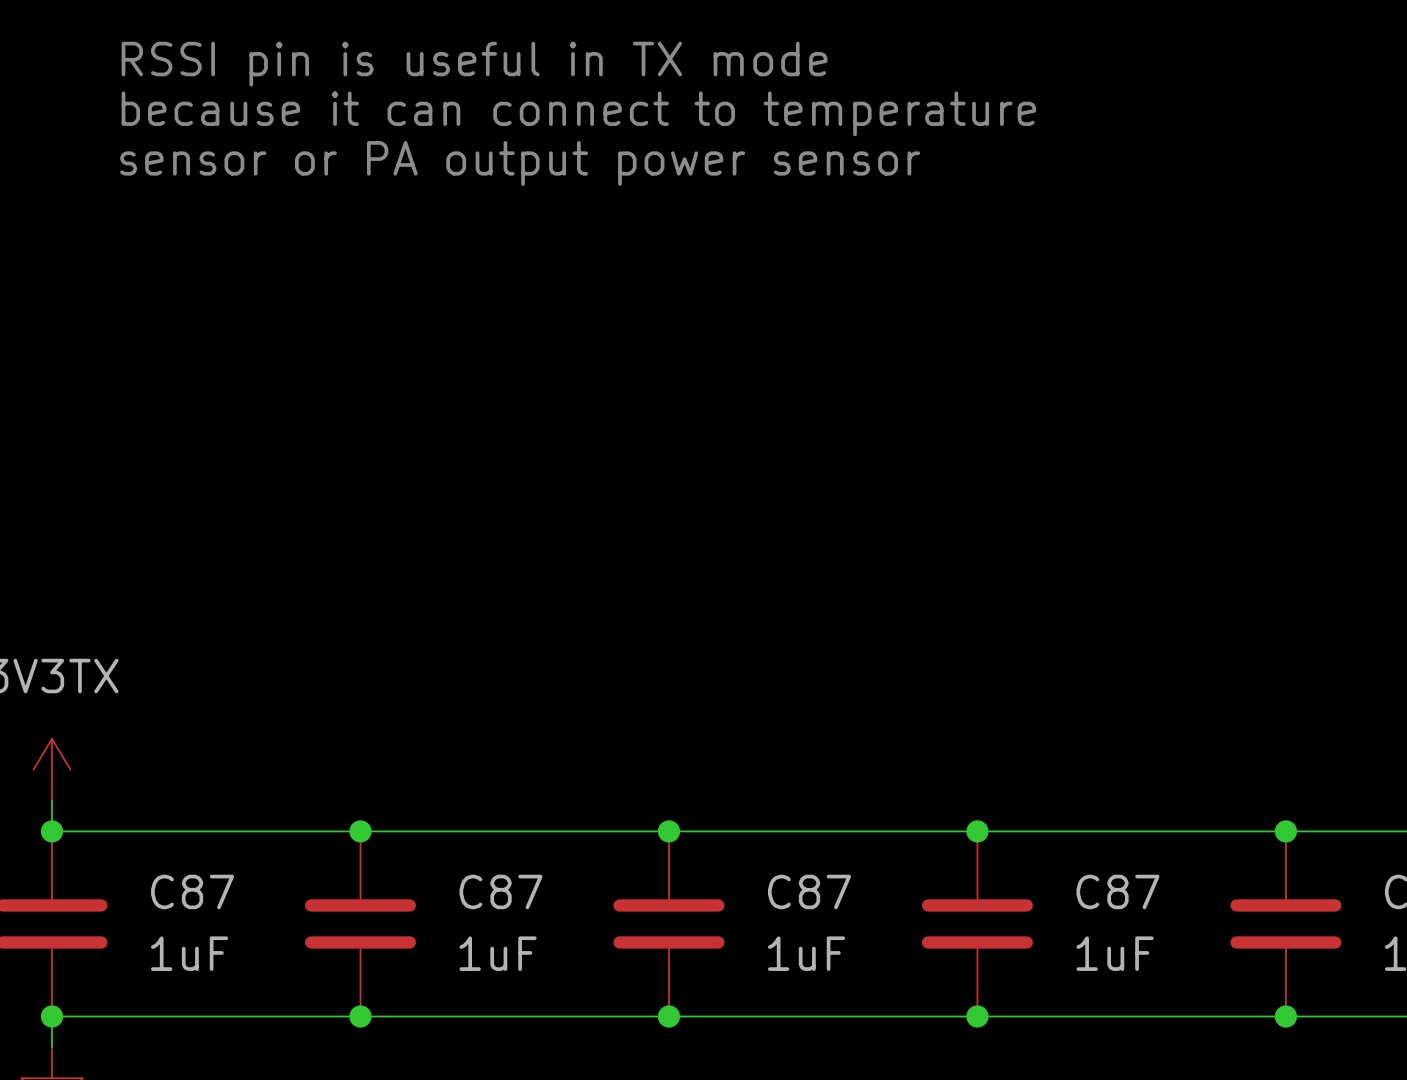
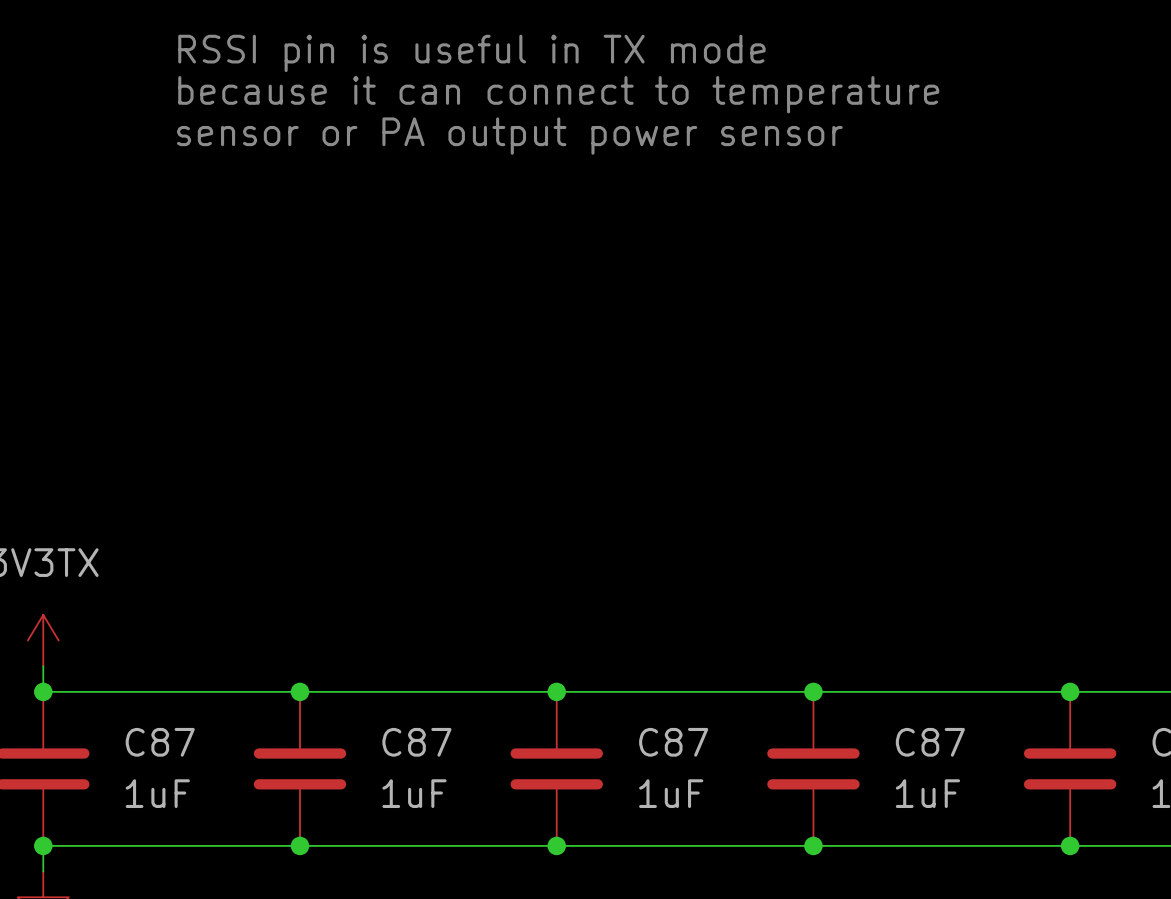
text position: RSSI pin is useful in TX mode (474, 64) -> RSSI pin is useful in TX mode (471, 53)
text position: because it can connect to temperature (578, 113) -> because it can connect to temperature (558, 94)
text position: sensor or PA output power sensor (520, 163) -> sensor or PA output power sensor (509, 136)

